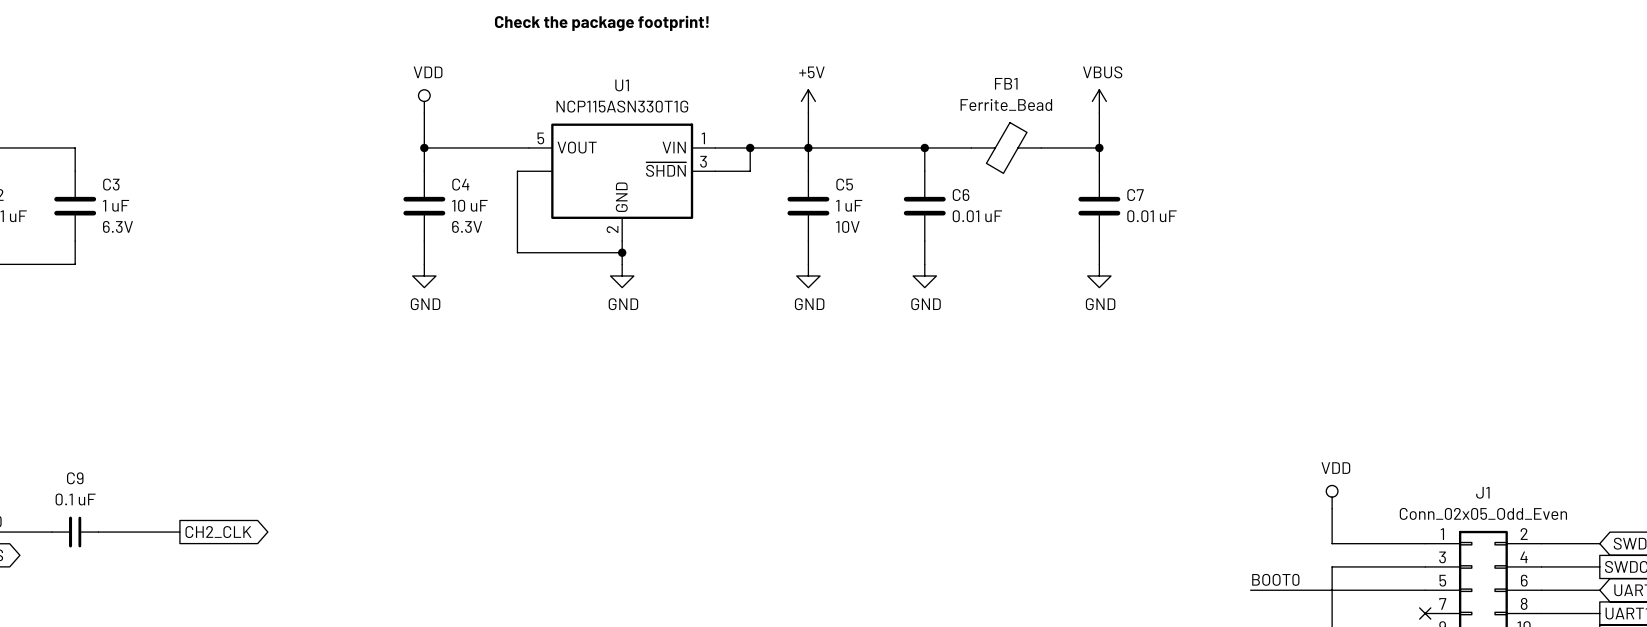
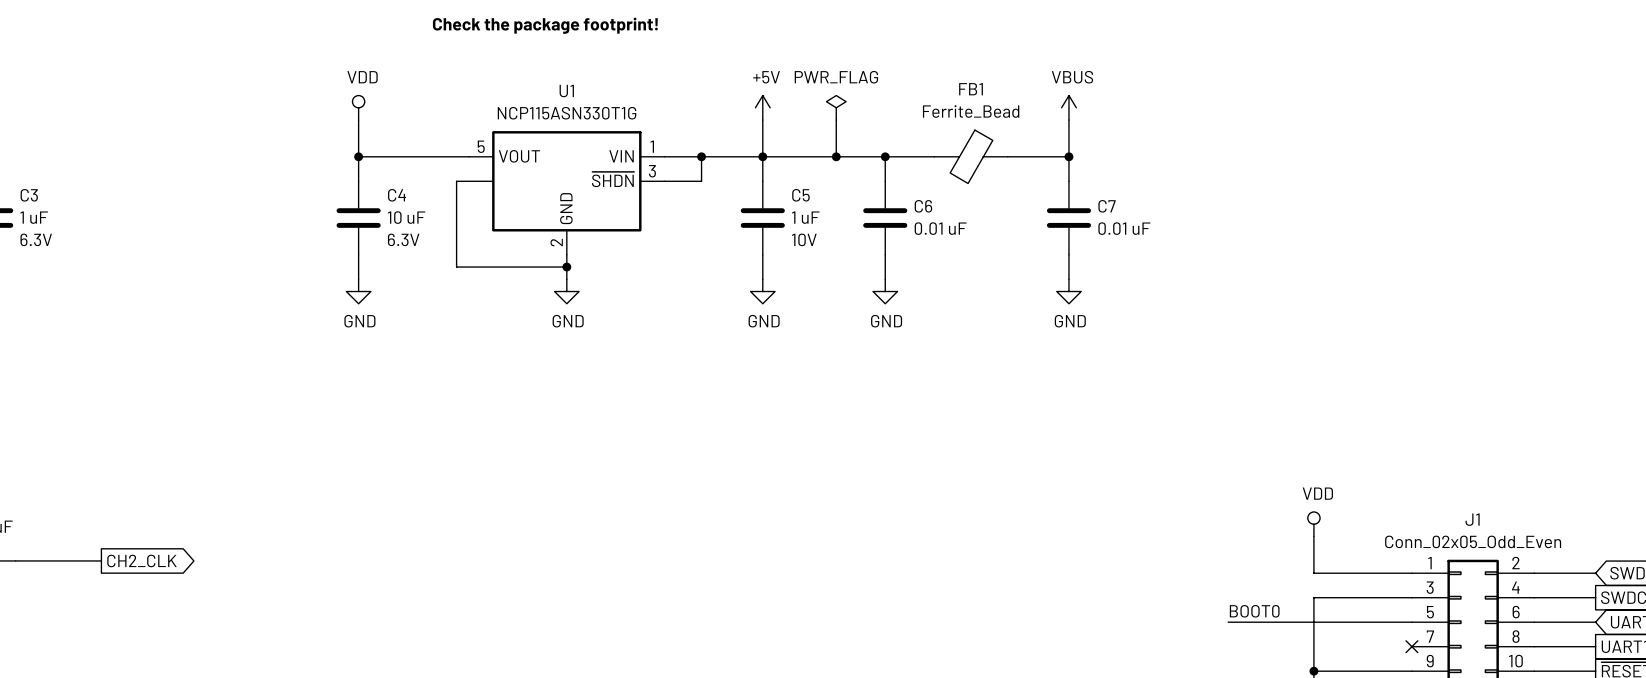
power symbol: none -> PWR_FLAG (836, 107)
wire: none -> (836, 120) (836, 156)
junction: none -> (836, 156)

